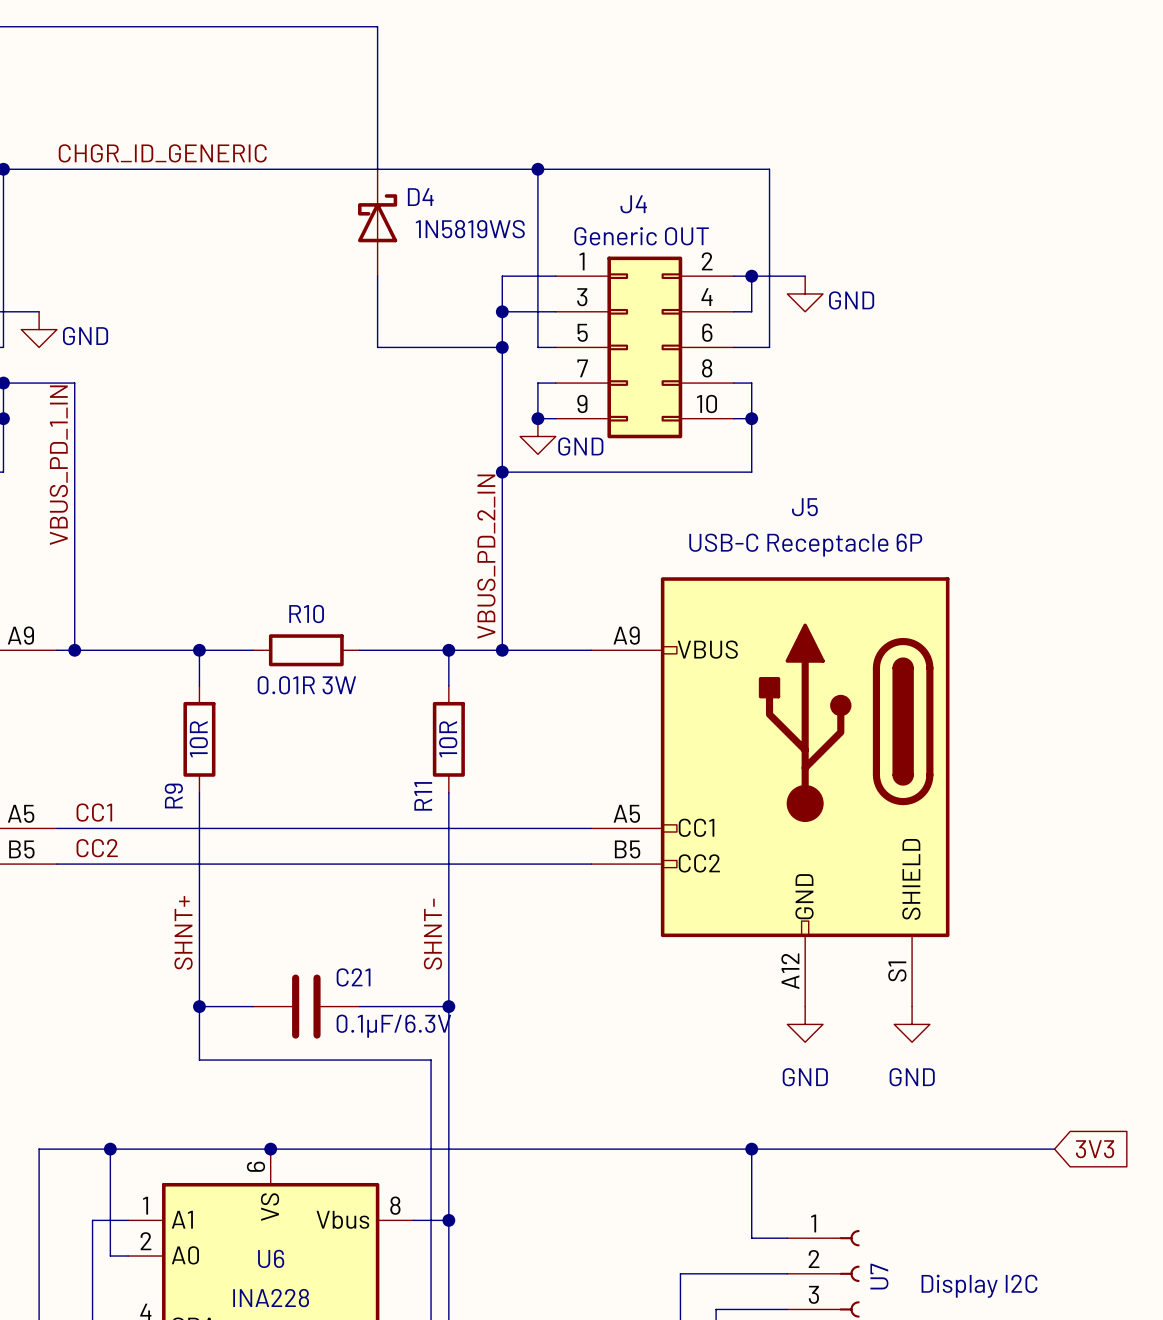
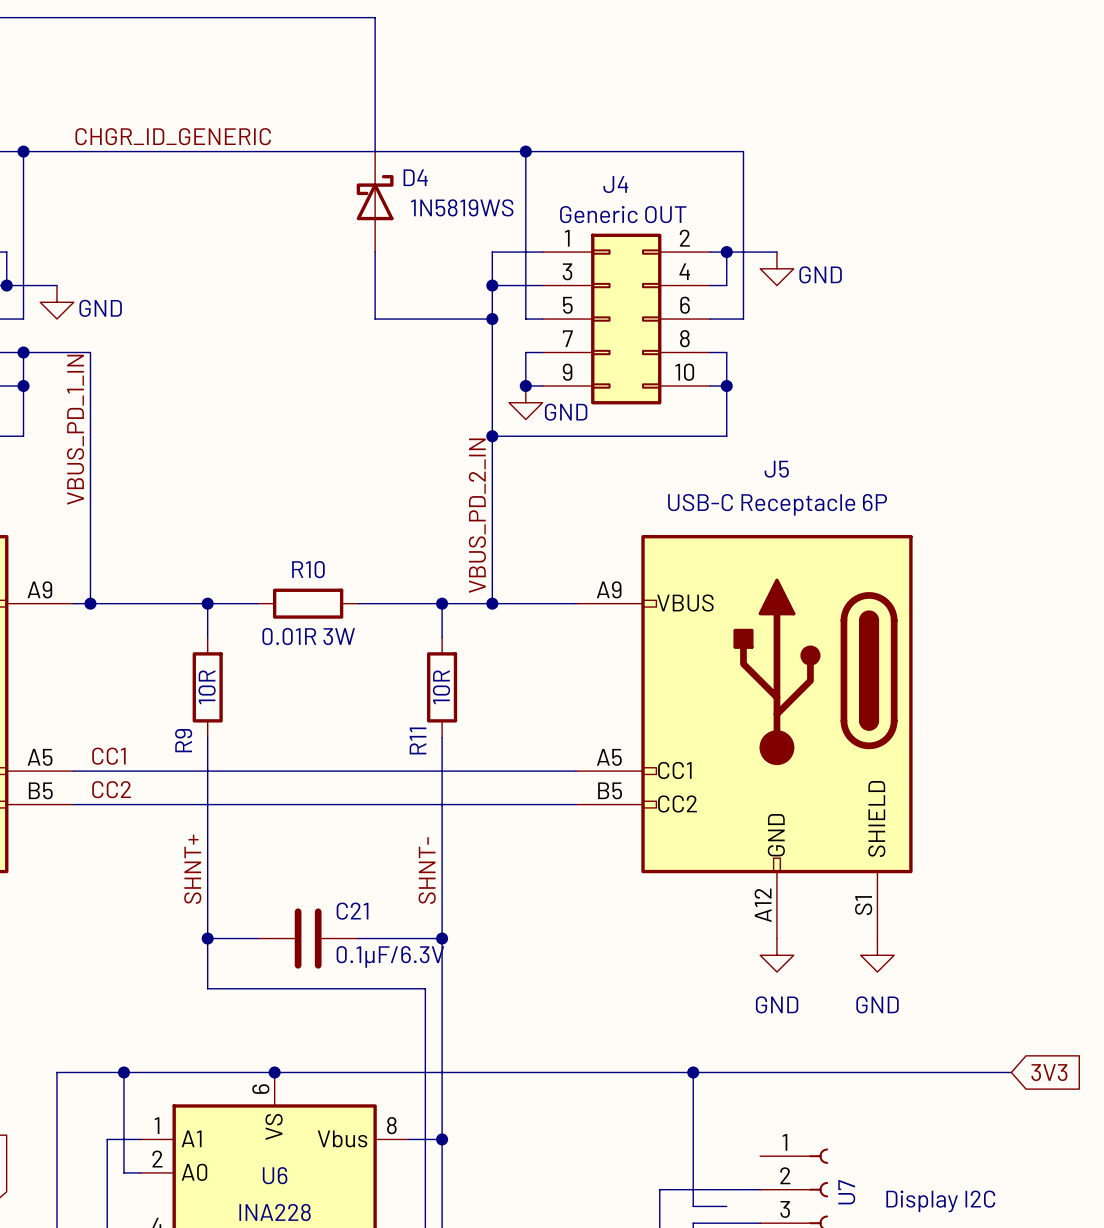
wire: none -> (693, 1072) (693, 1206) (726, 1206)
wire: (751, 1149) (751, 1238) (787, 1238) -> none
junction position: (751, 1149) -> (693, 1072)

